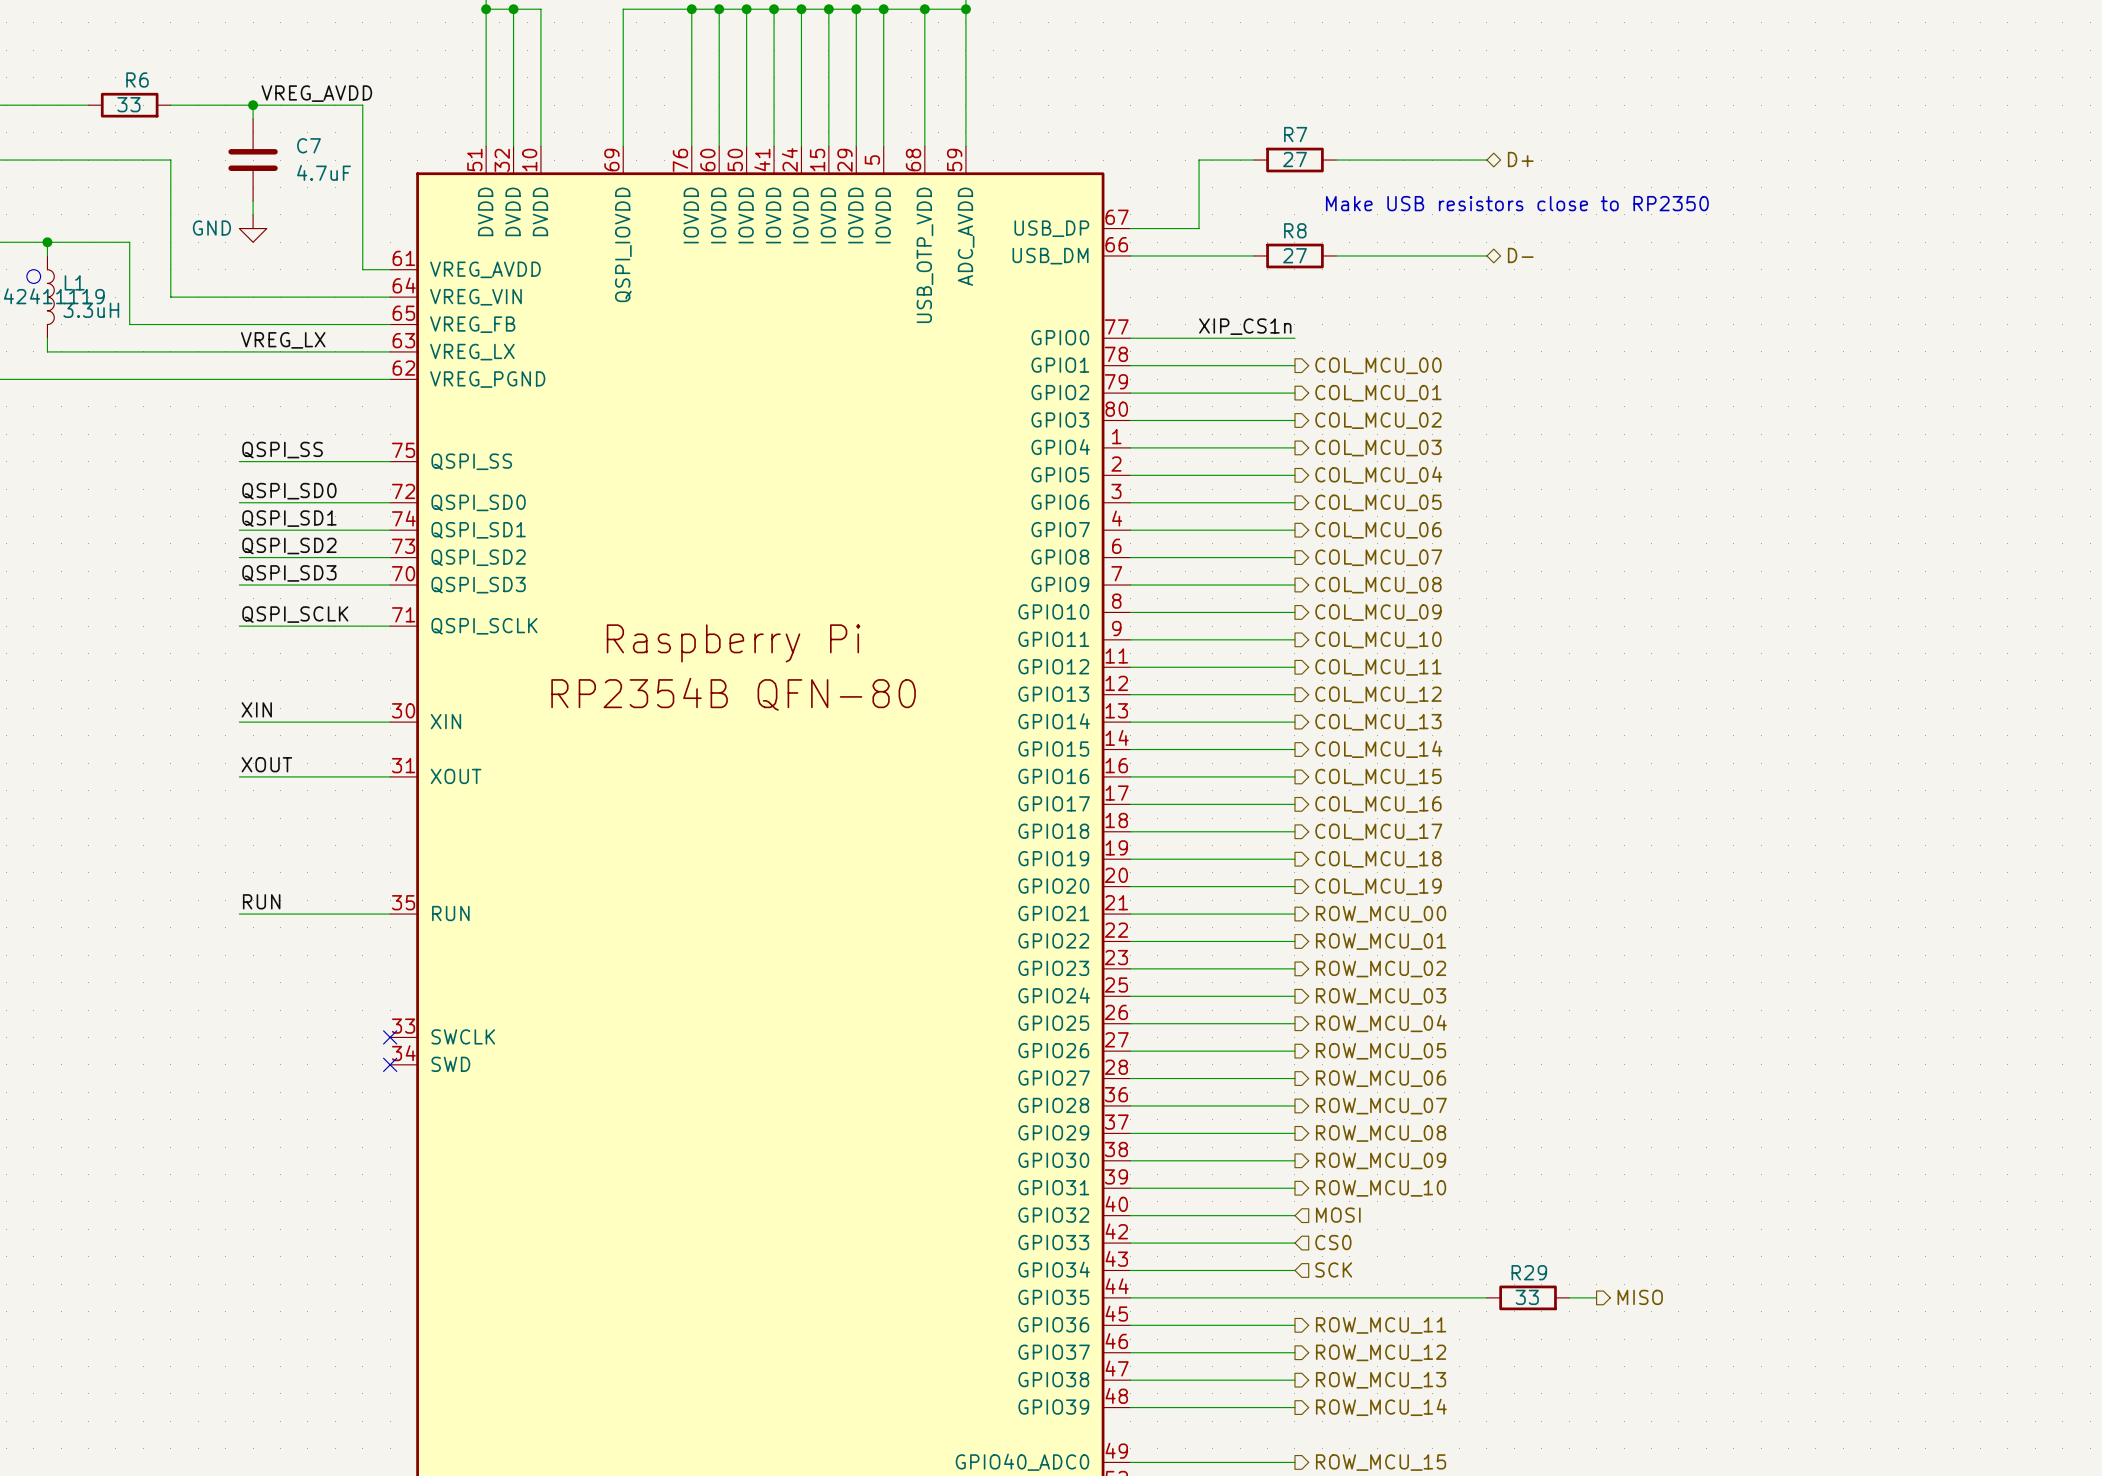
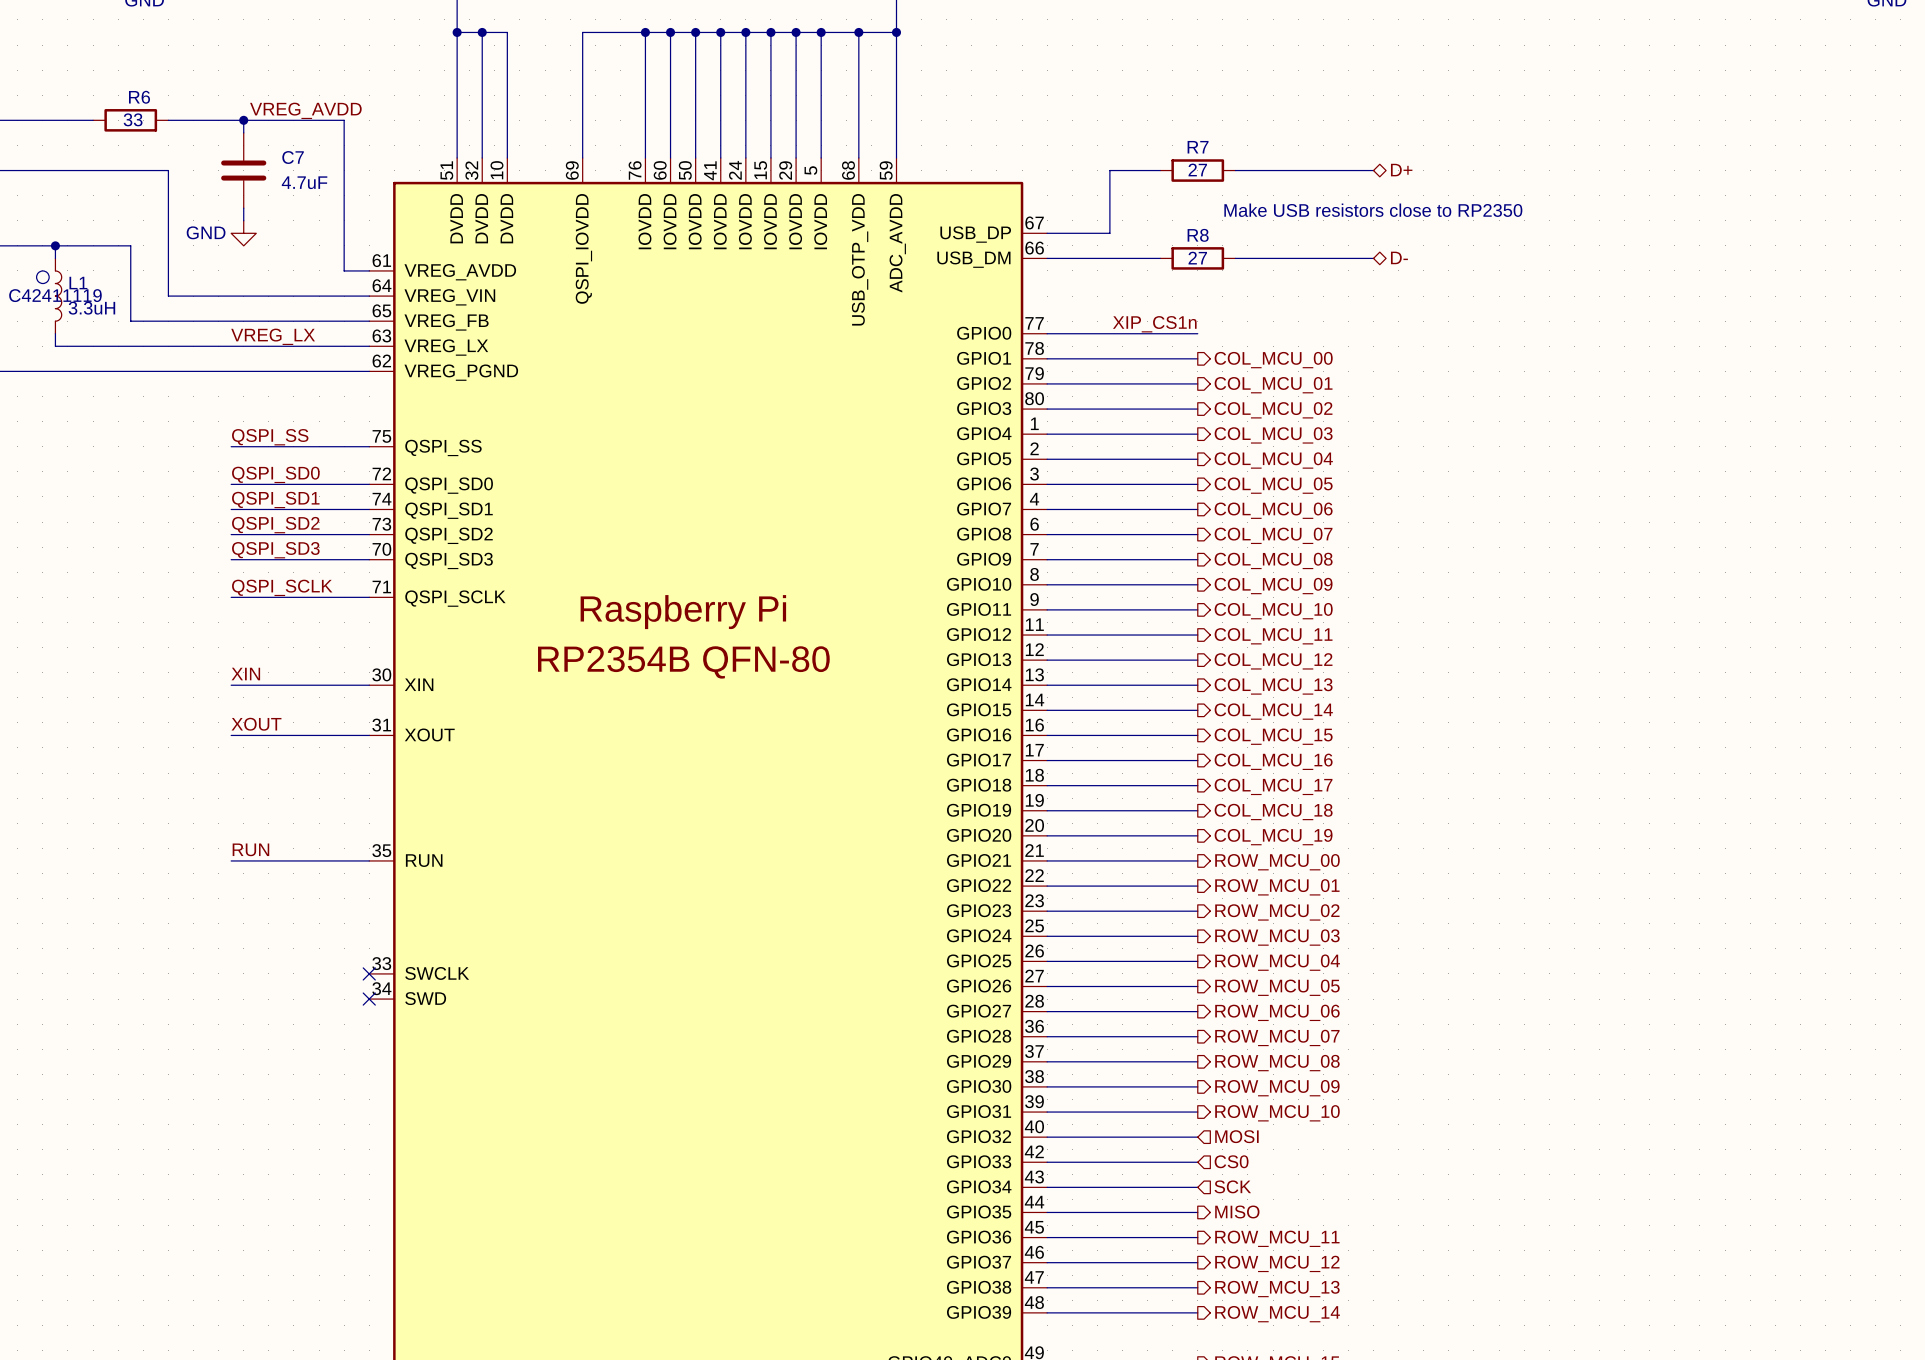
wire: (1294, 1297) (1486, 1297) -> none
hierarchical label: none -> MISO (1237, 1211)
R29: 33 (1528, 1297) -> none
wire: (1569, 1297) (1596, 1297) -> none
hierarchical label: MISO (1640, 1297) -> none

